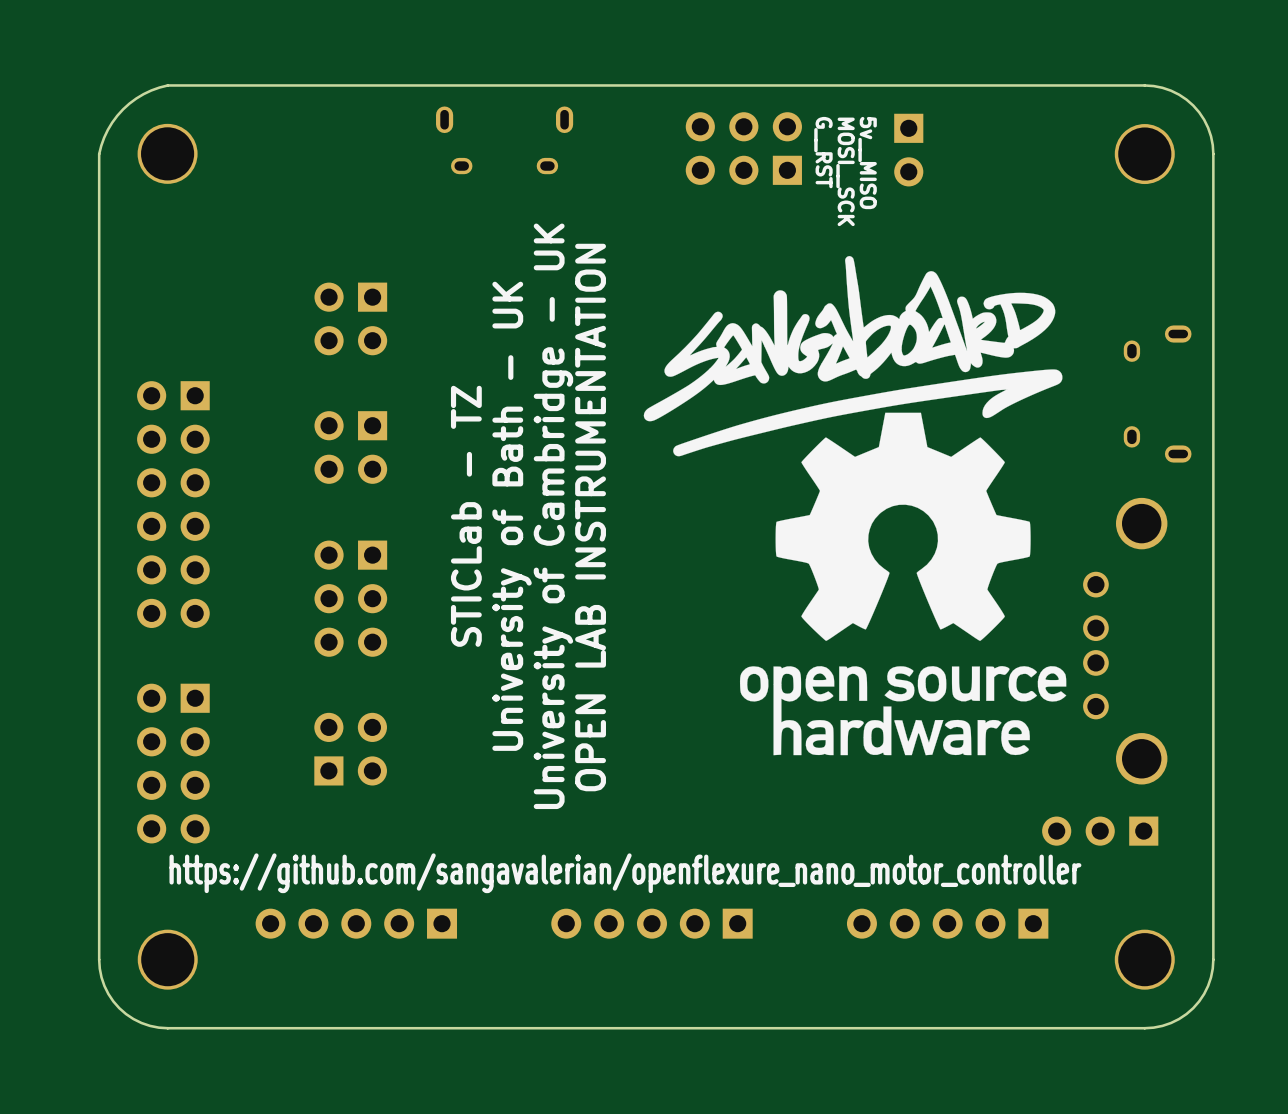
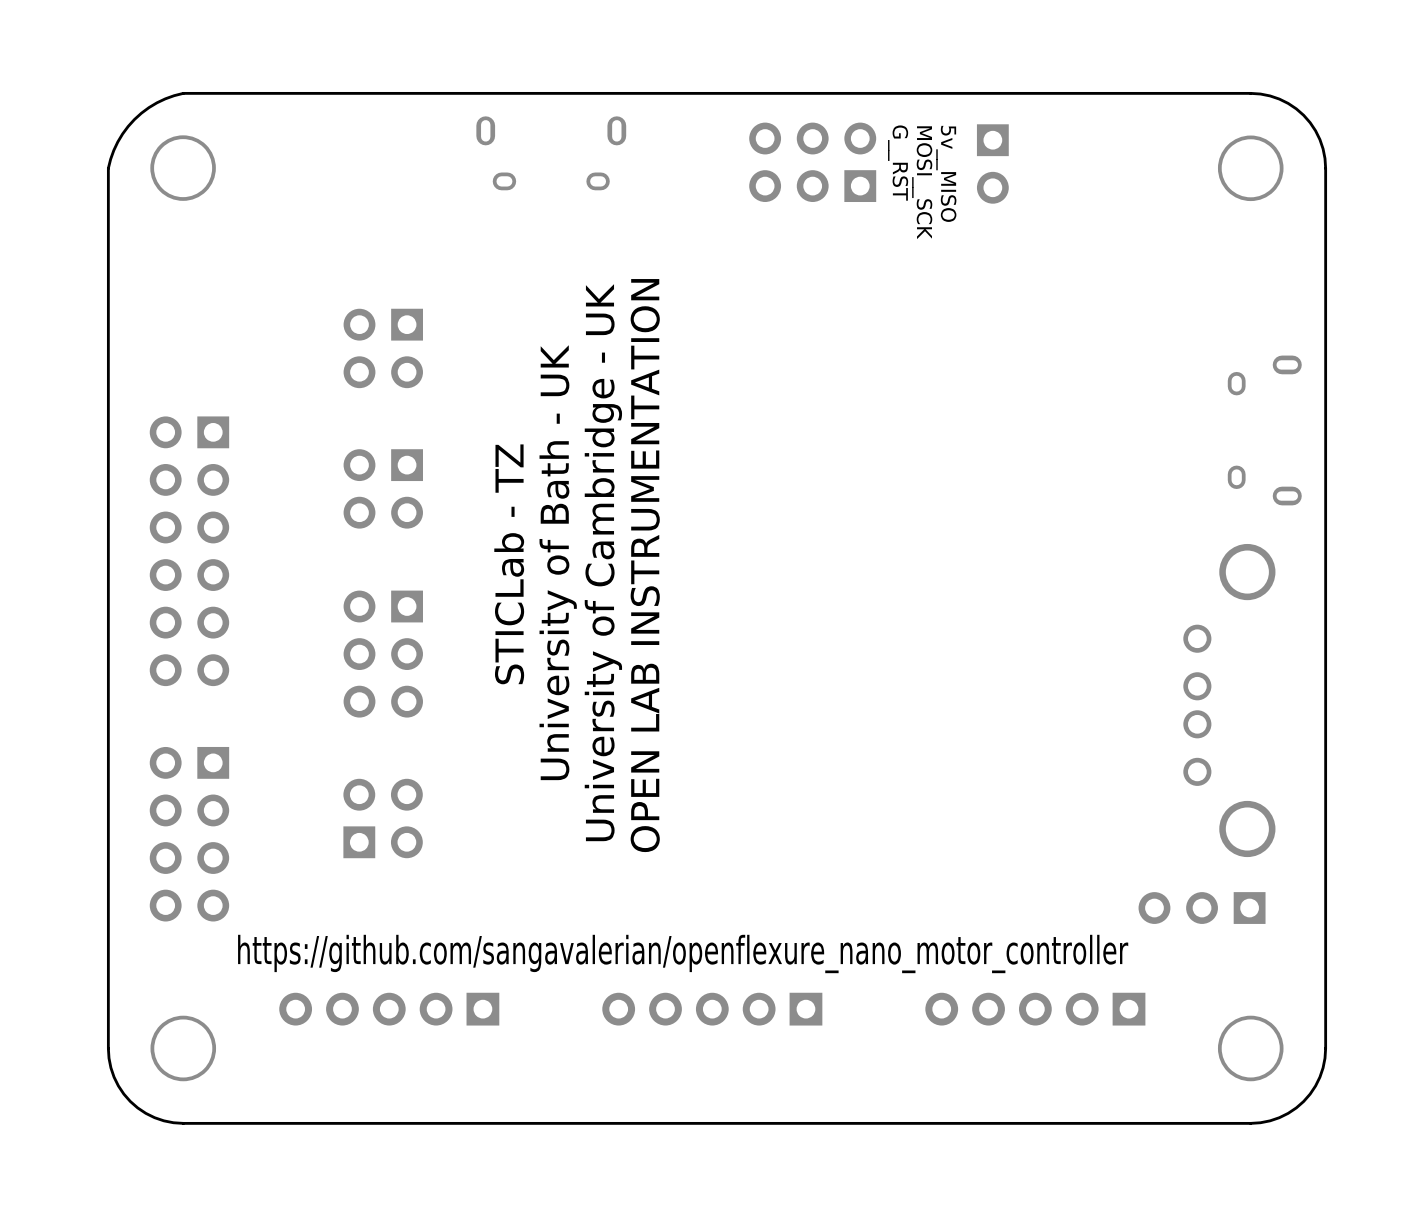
drawing: [643, 256, 1067, 756] -> none

